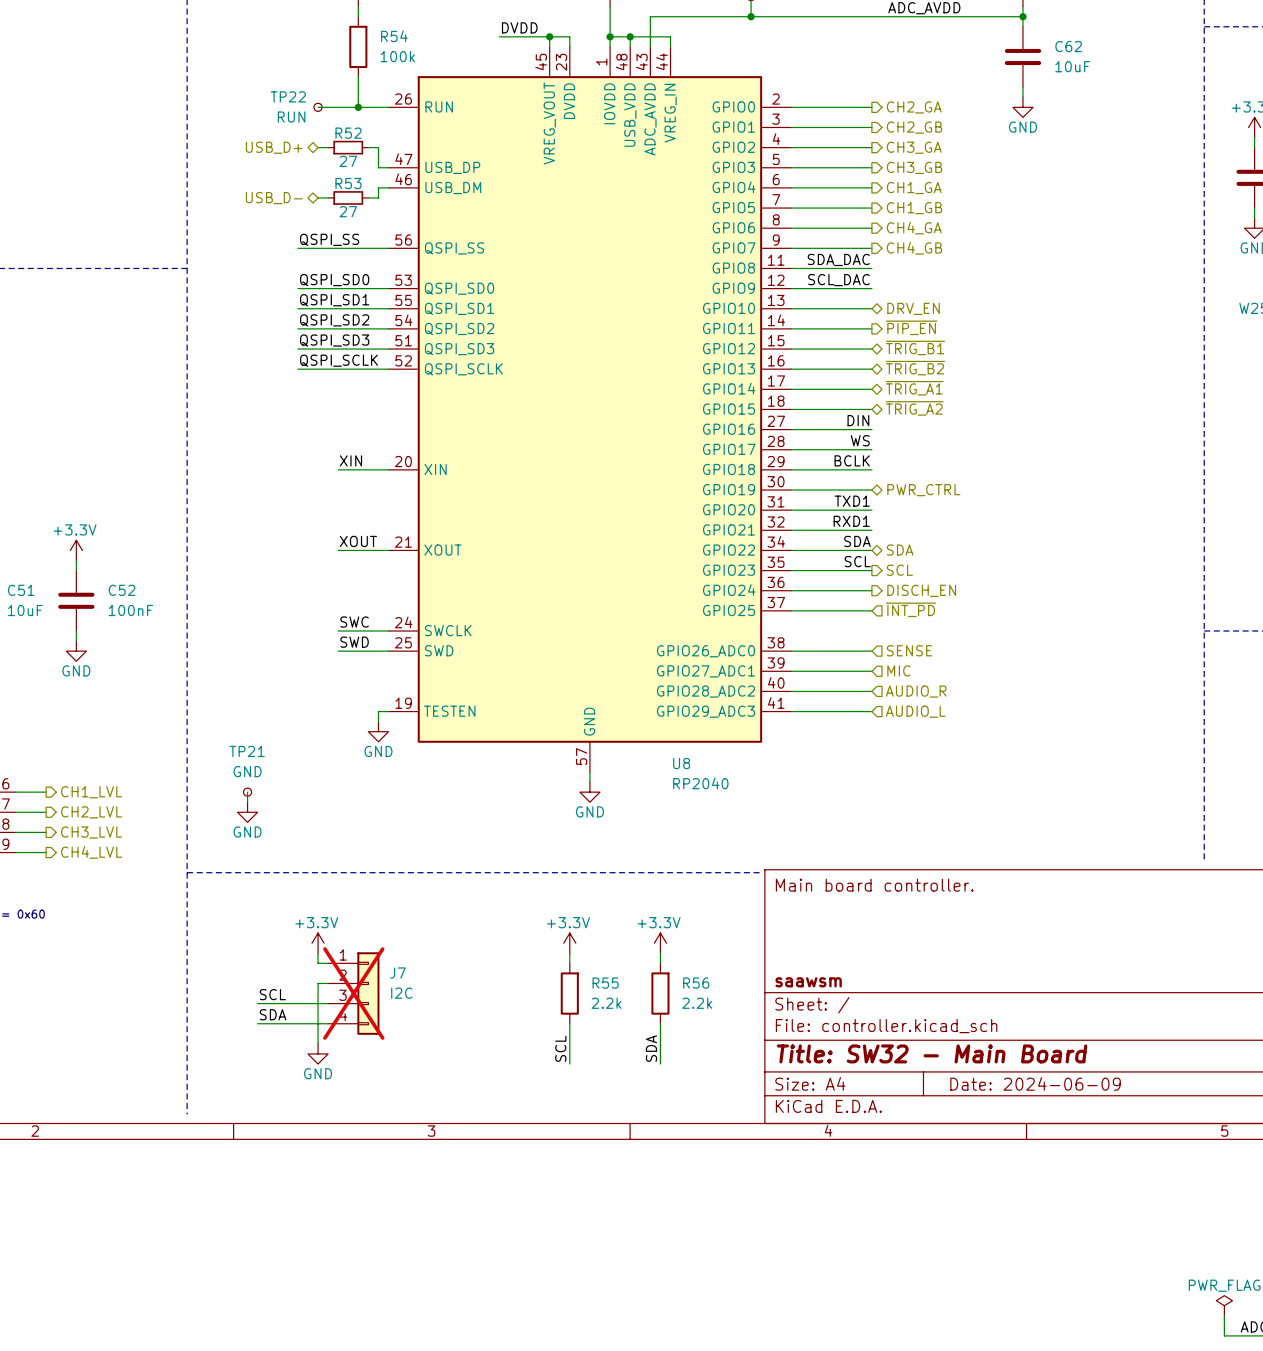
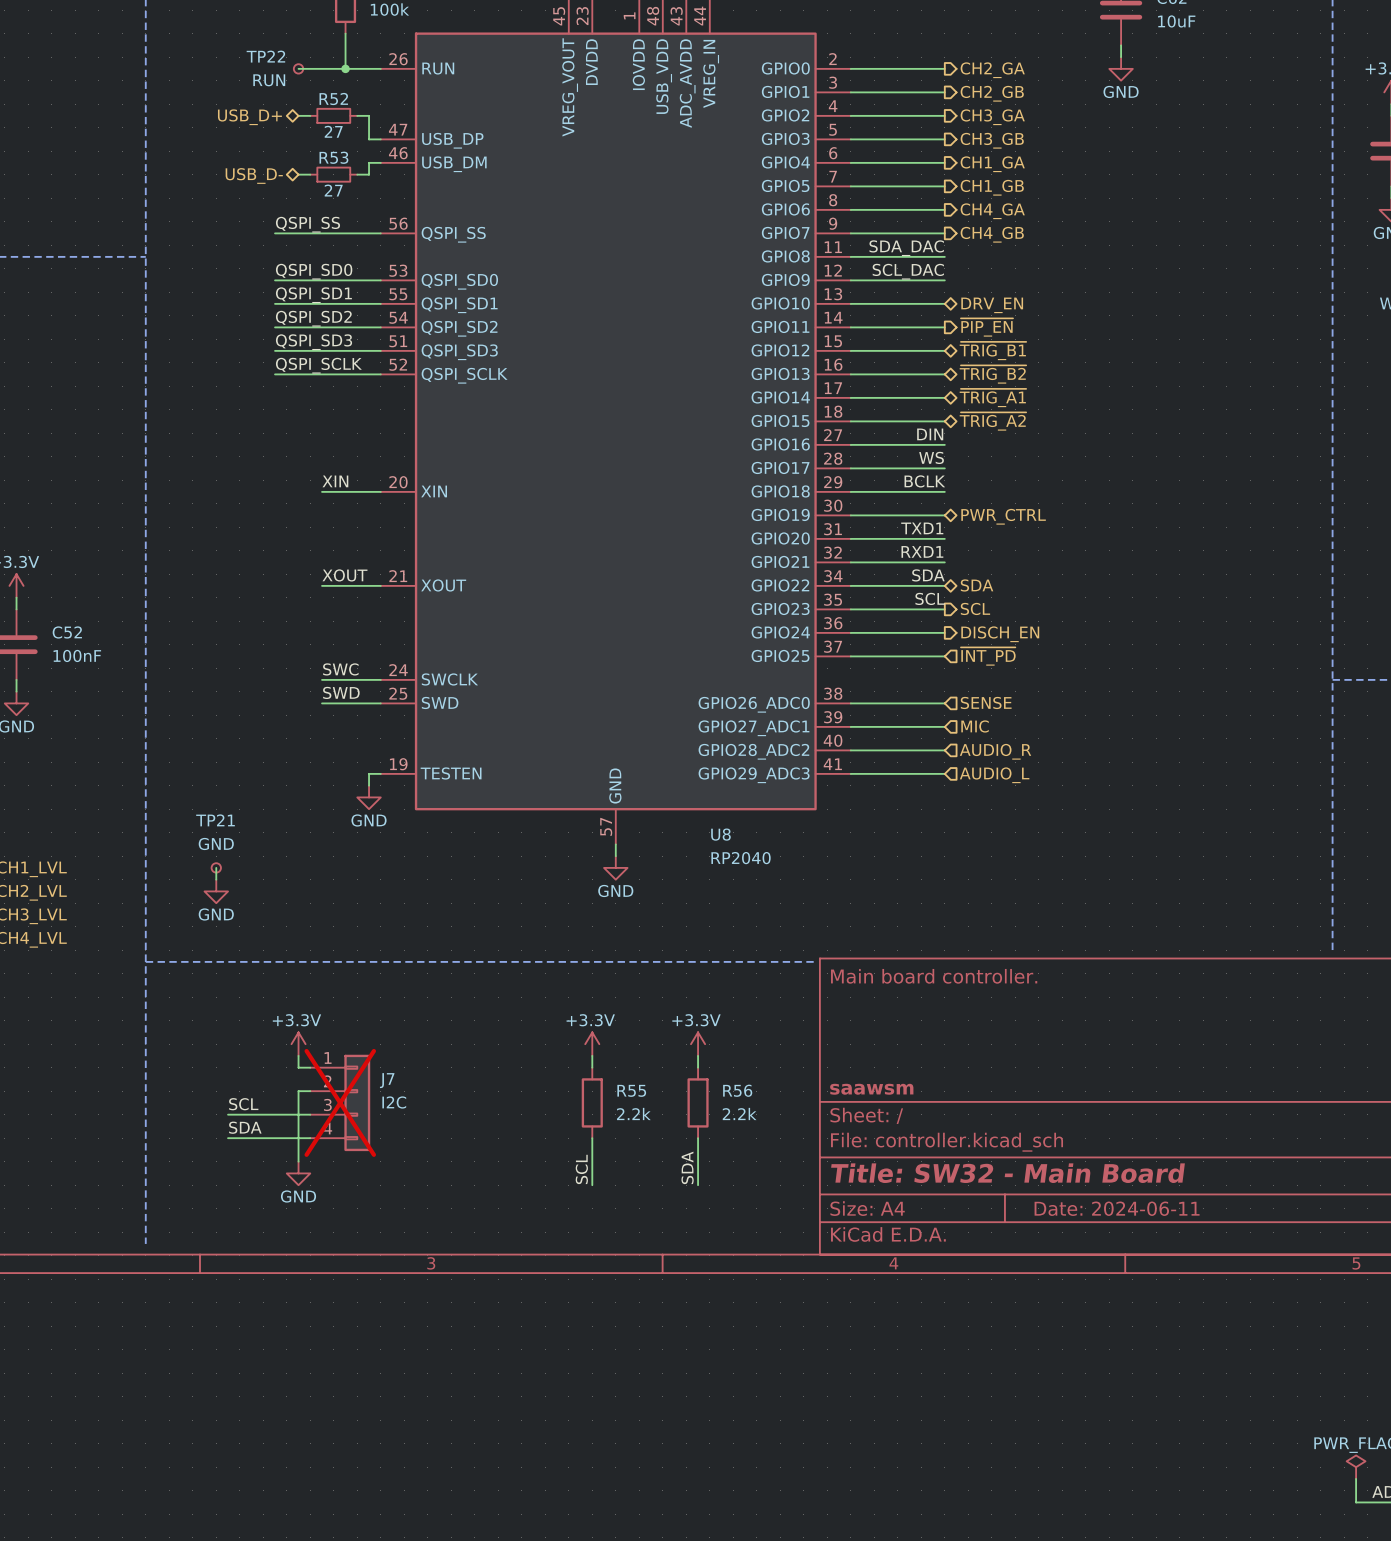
title block: Date: 2024-06-09 (1035, 1083) -> Date: 2024-06-11 (1117, 1208)

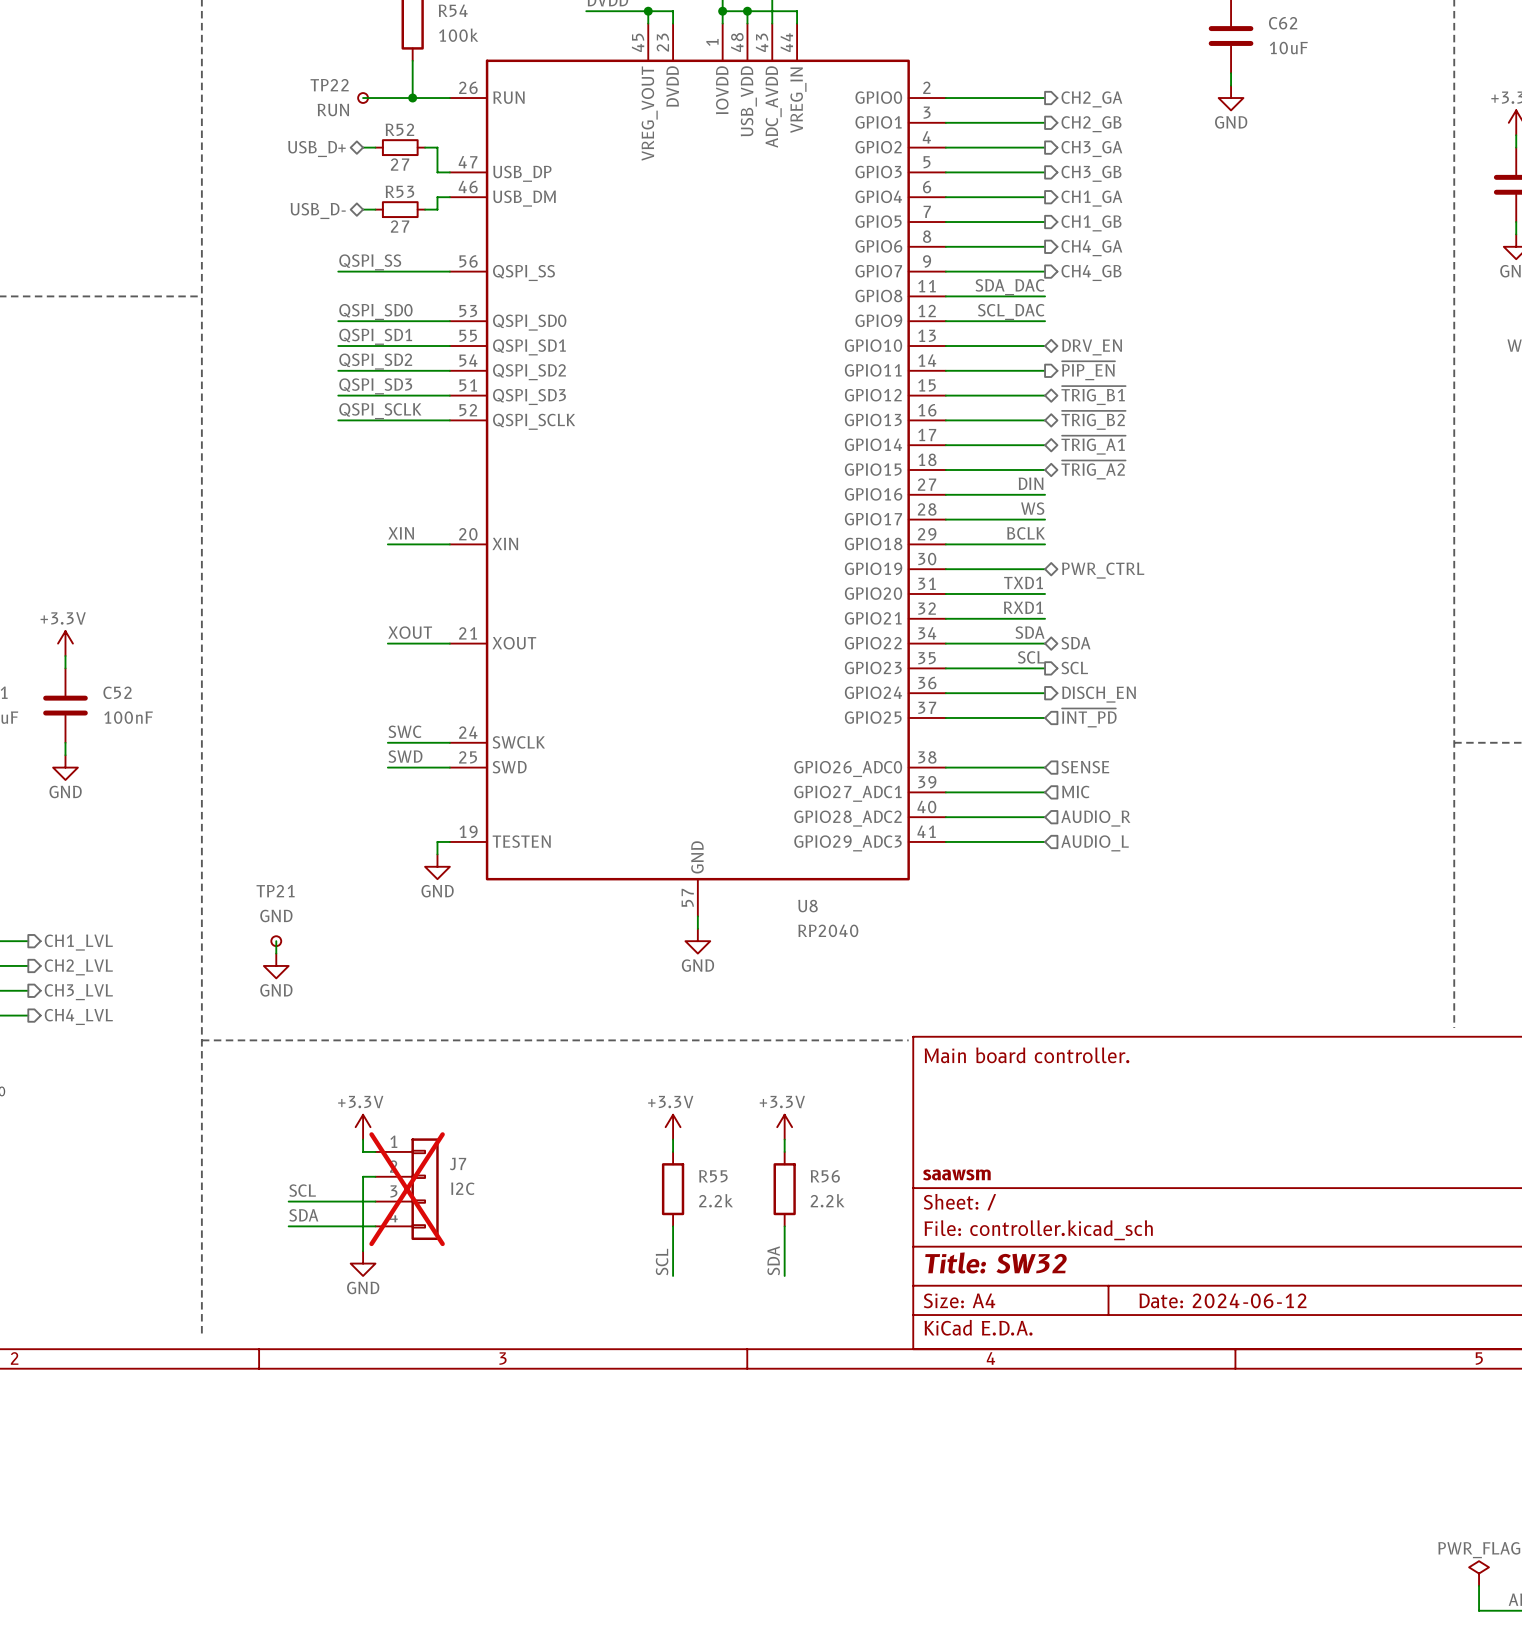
title block: Title: SW32 - Main Board (1008, 1173) -> Title: SW32 (996, 1262)
title block: Date: 2024-06-11 (1117, 1208) -> Date: 2024-06-12 (1222, 1300)

